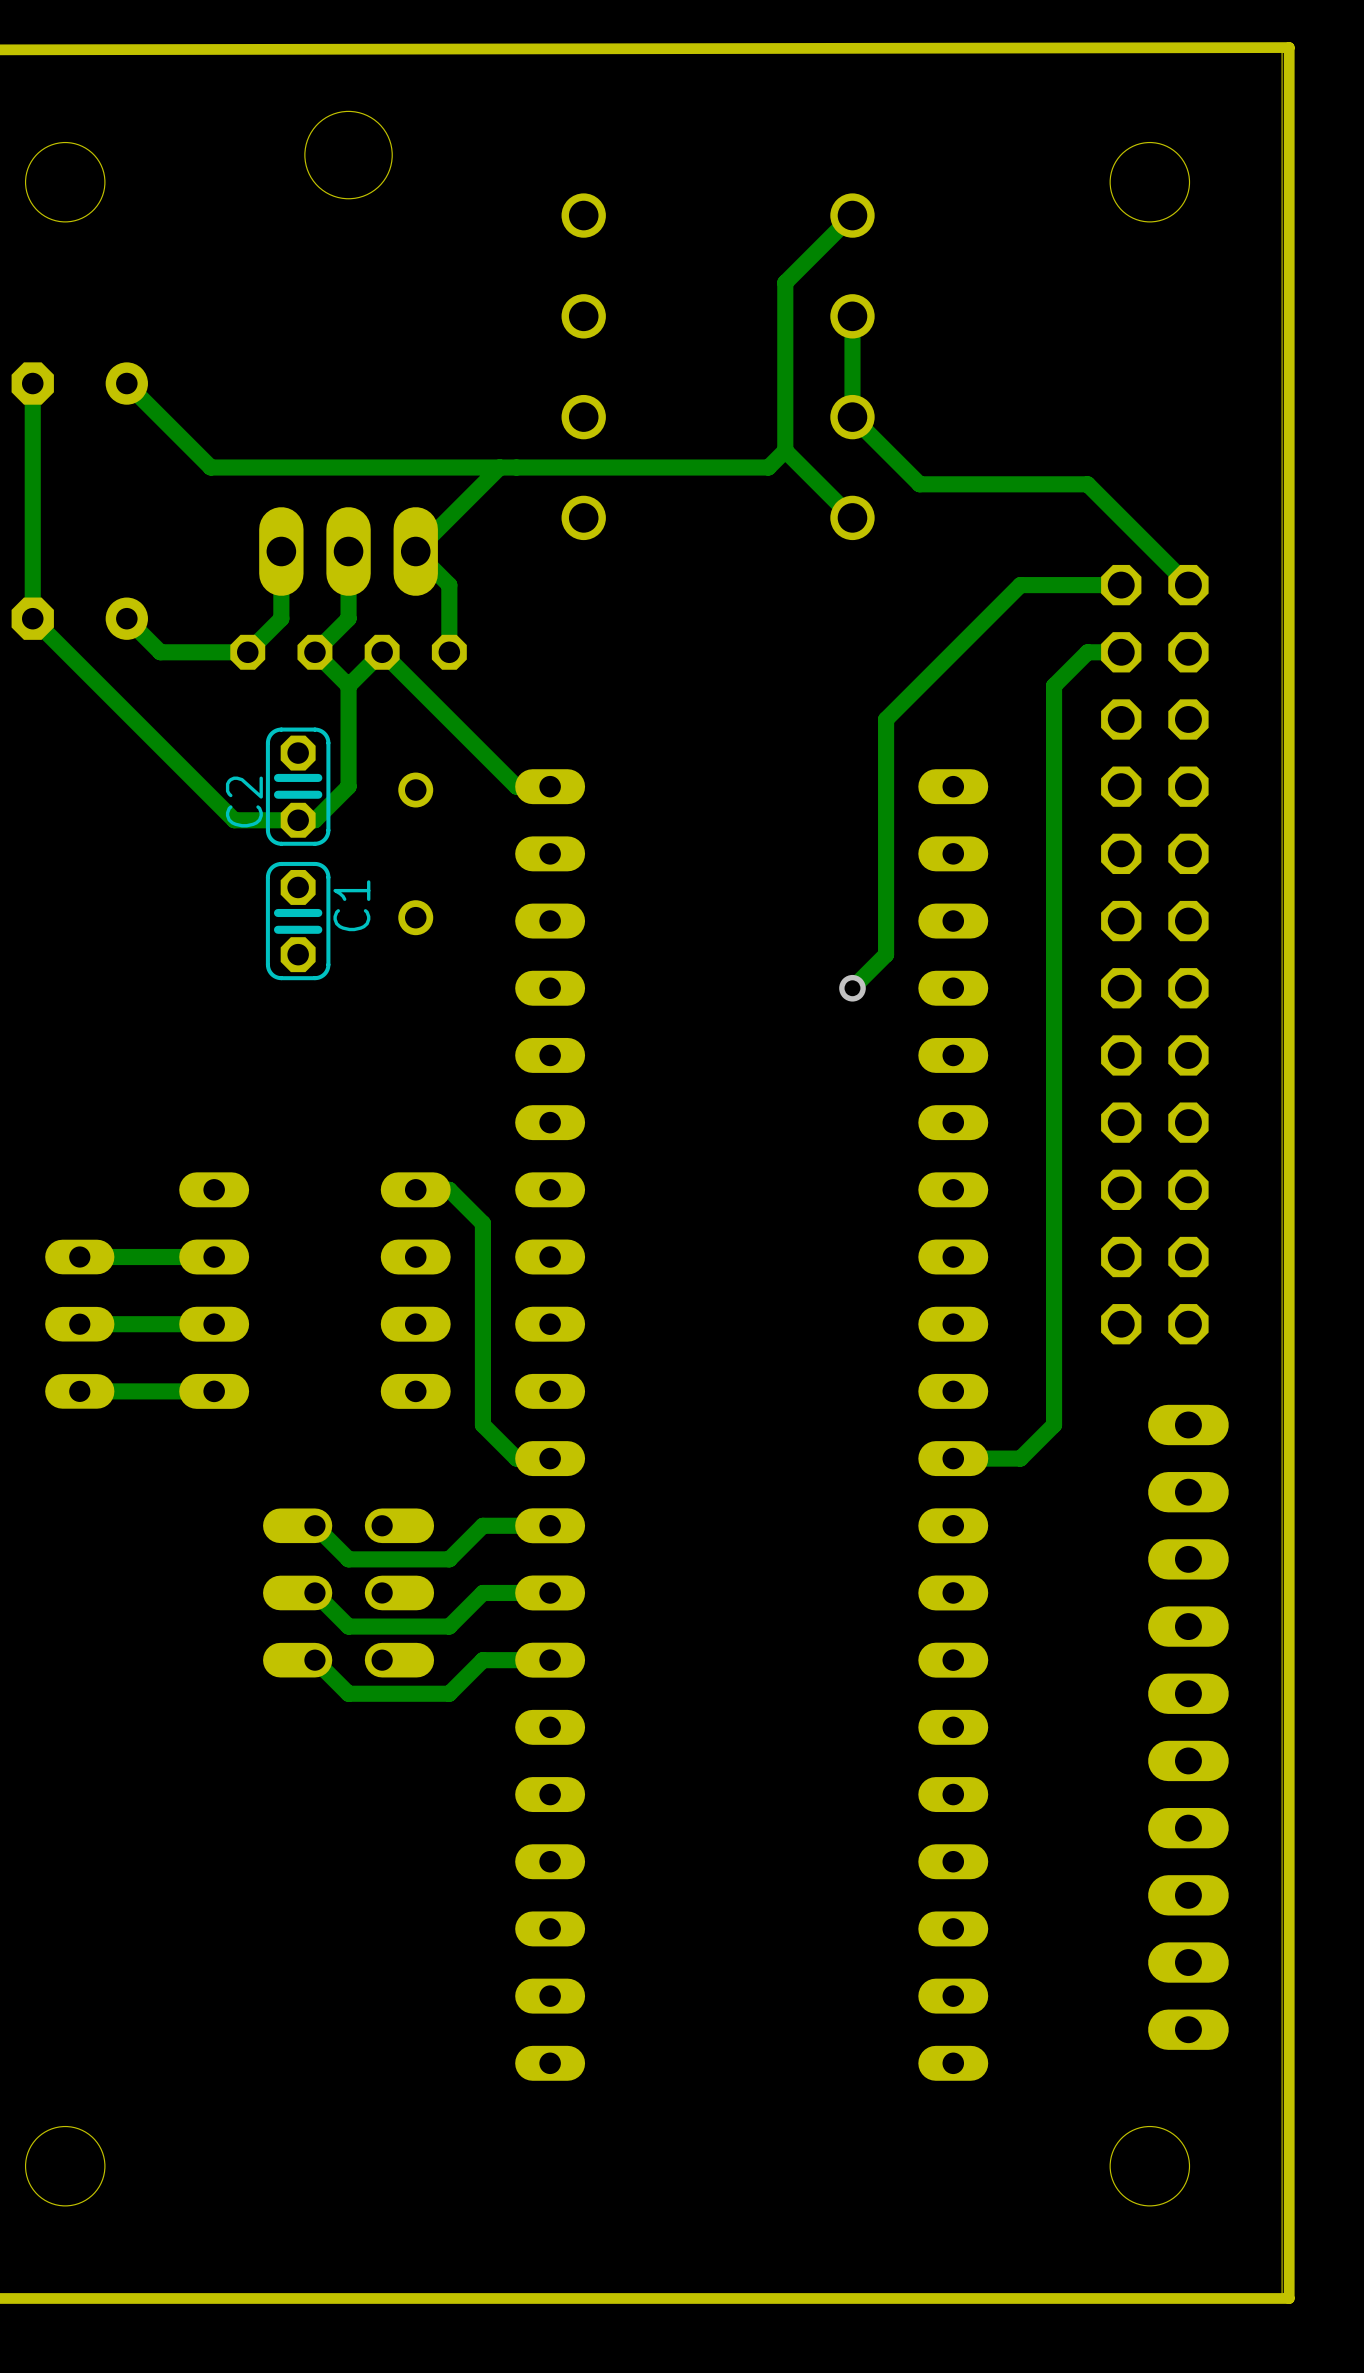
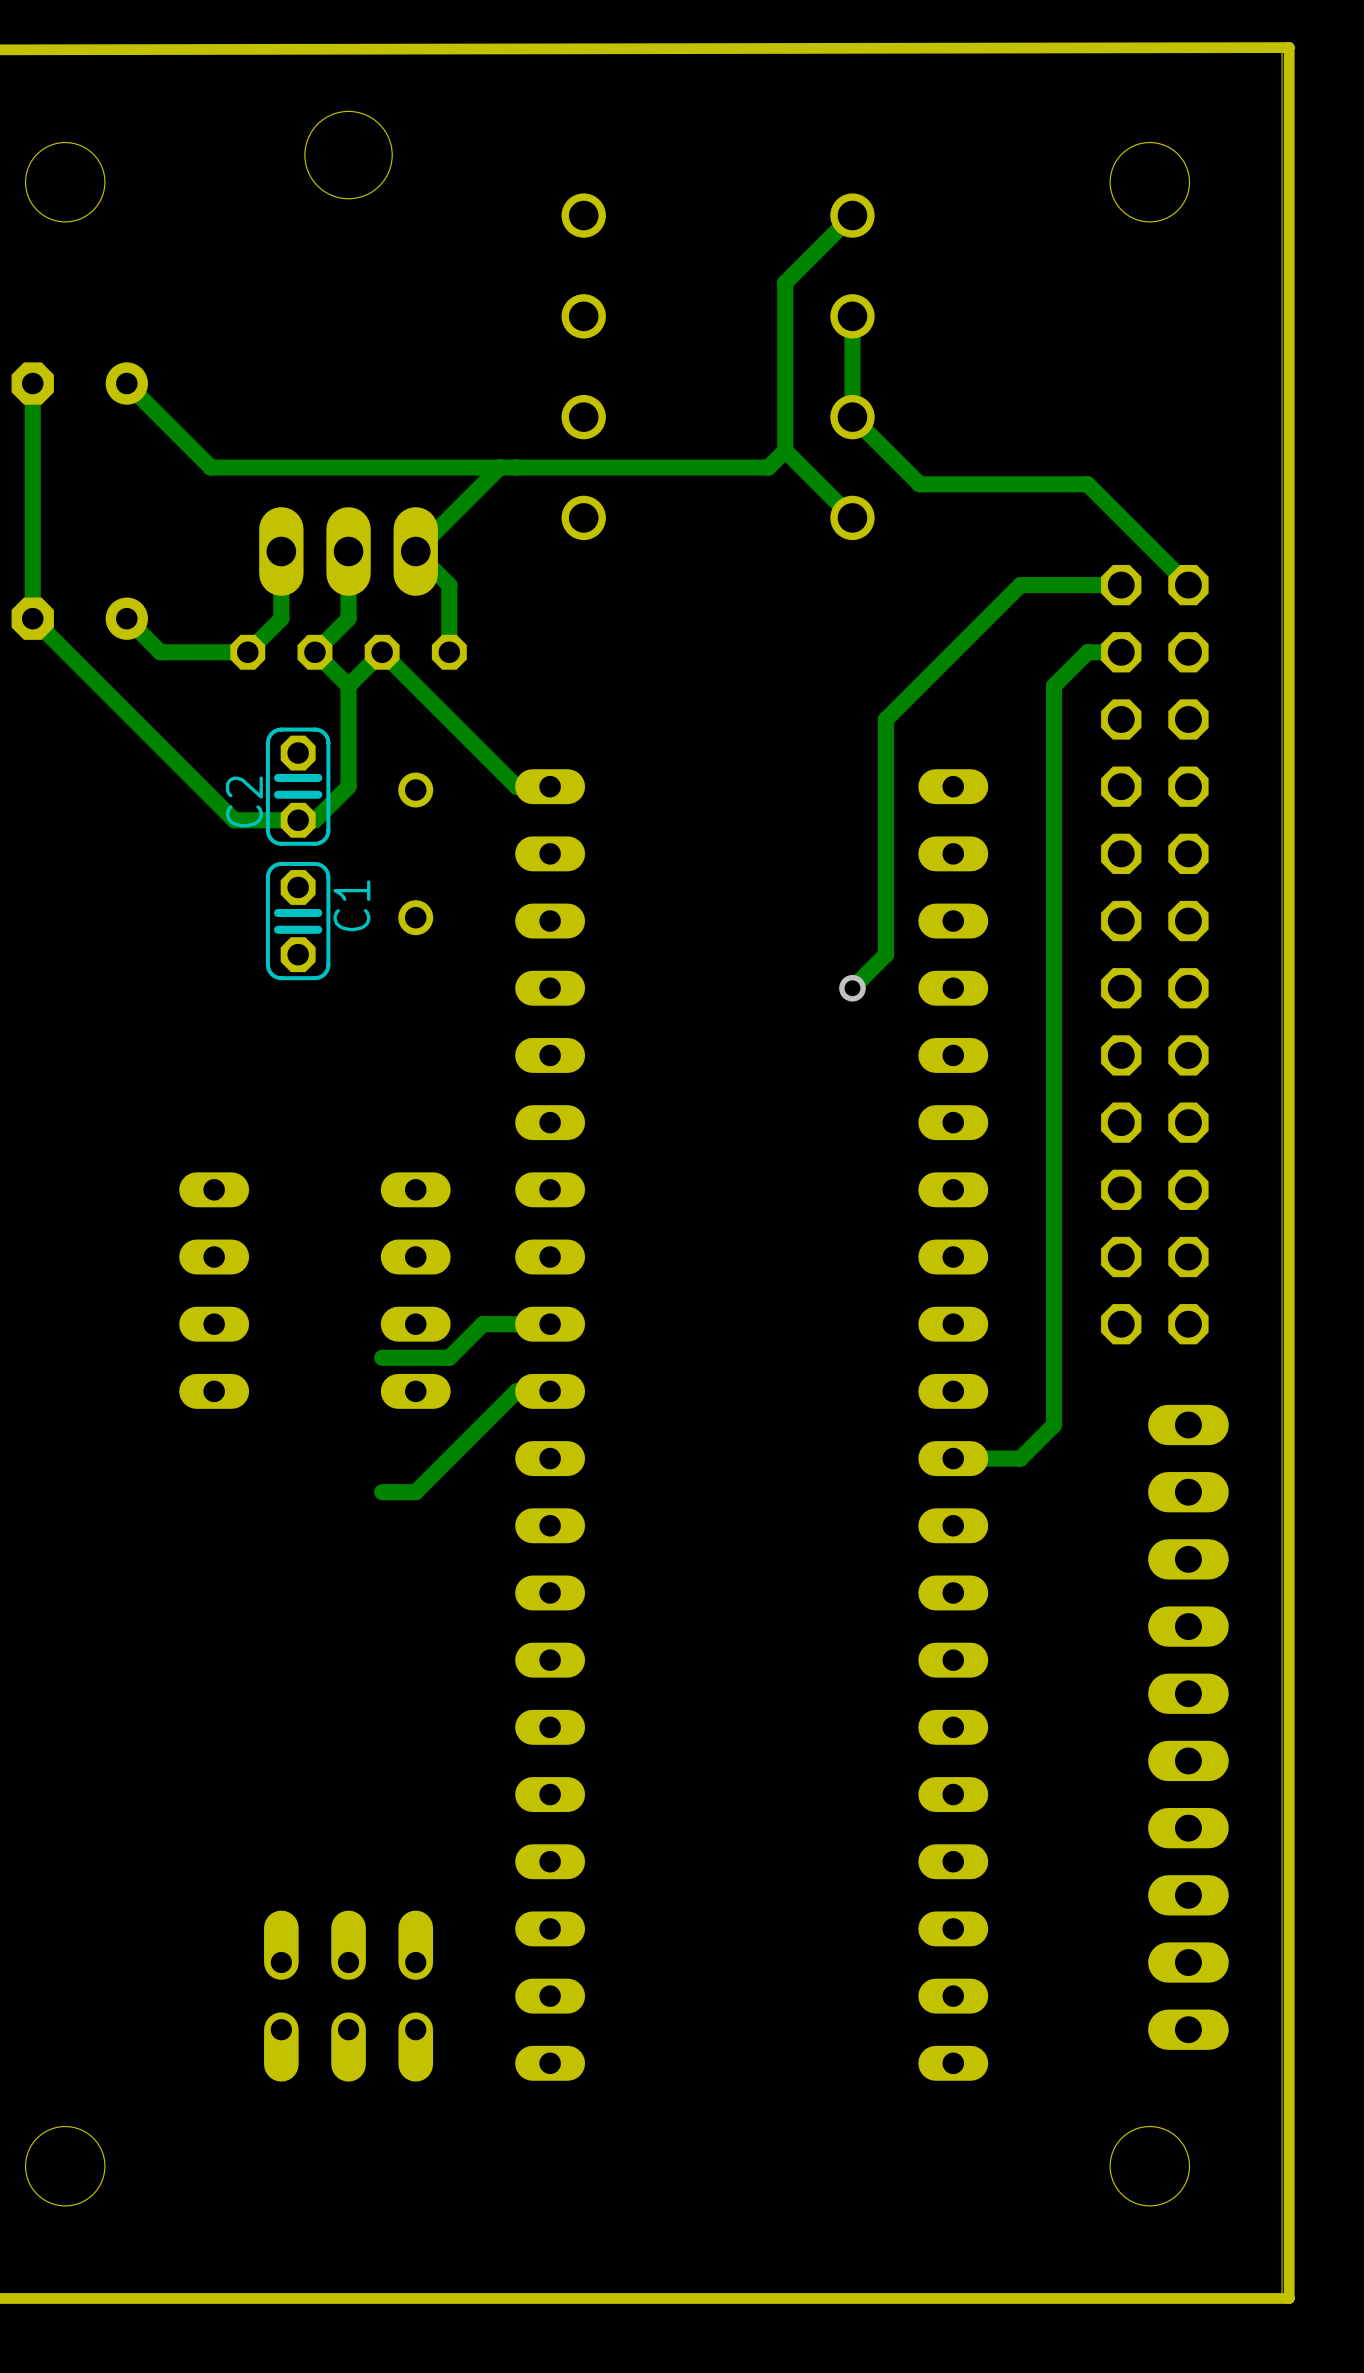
track: (415, 1189) (449, 1189) (482, 1223) (482, 1424) (516, 1458) (550, 1458) -> none
track: (214, 1257) (79, 1257) -> none
part: (79, 1324) -> none
track: (214, 1324) (79, 1324) -> none
track: none -> (550, 1324) (482, 1324) (449, 1357) (382, 1357)
track: (214, 1391) (79, 1391) -> none
track: none -> (550, 1391) (516, 1391) (415, 1492) (382, 1492)
track: (550, 1525) (482, 1525) (449, 1559) (348, 1559) (314, 1525) -> none
part rotation: 0° (348, 1592) -> 90° clockwise (348, 1996)
part position: (348, 1592) -> (348, 1996)
track: (550, 1592) (482, 1592) (449, 1626) (348, 1626) (314, 1592) -> none
track: (550, 1660) (482, 1660) (449, 1693) (348, 1693) (314, 1660) -> none

